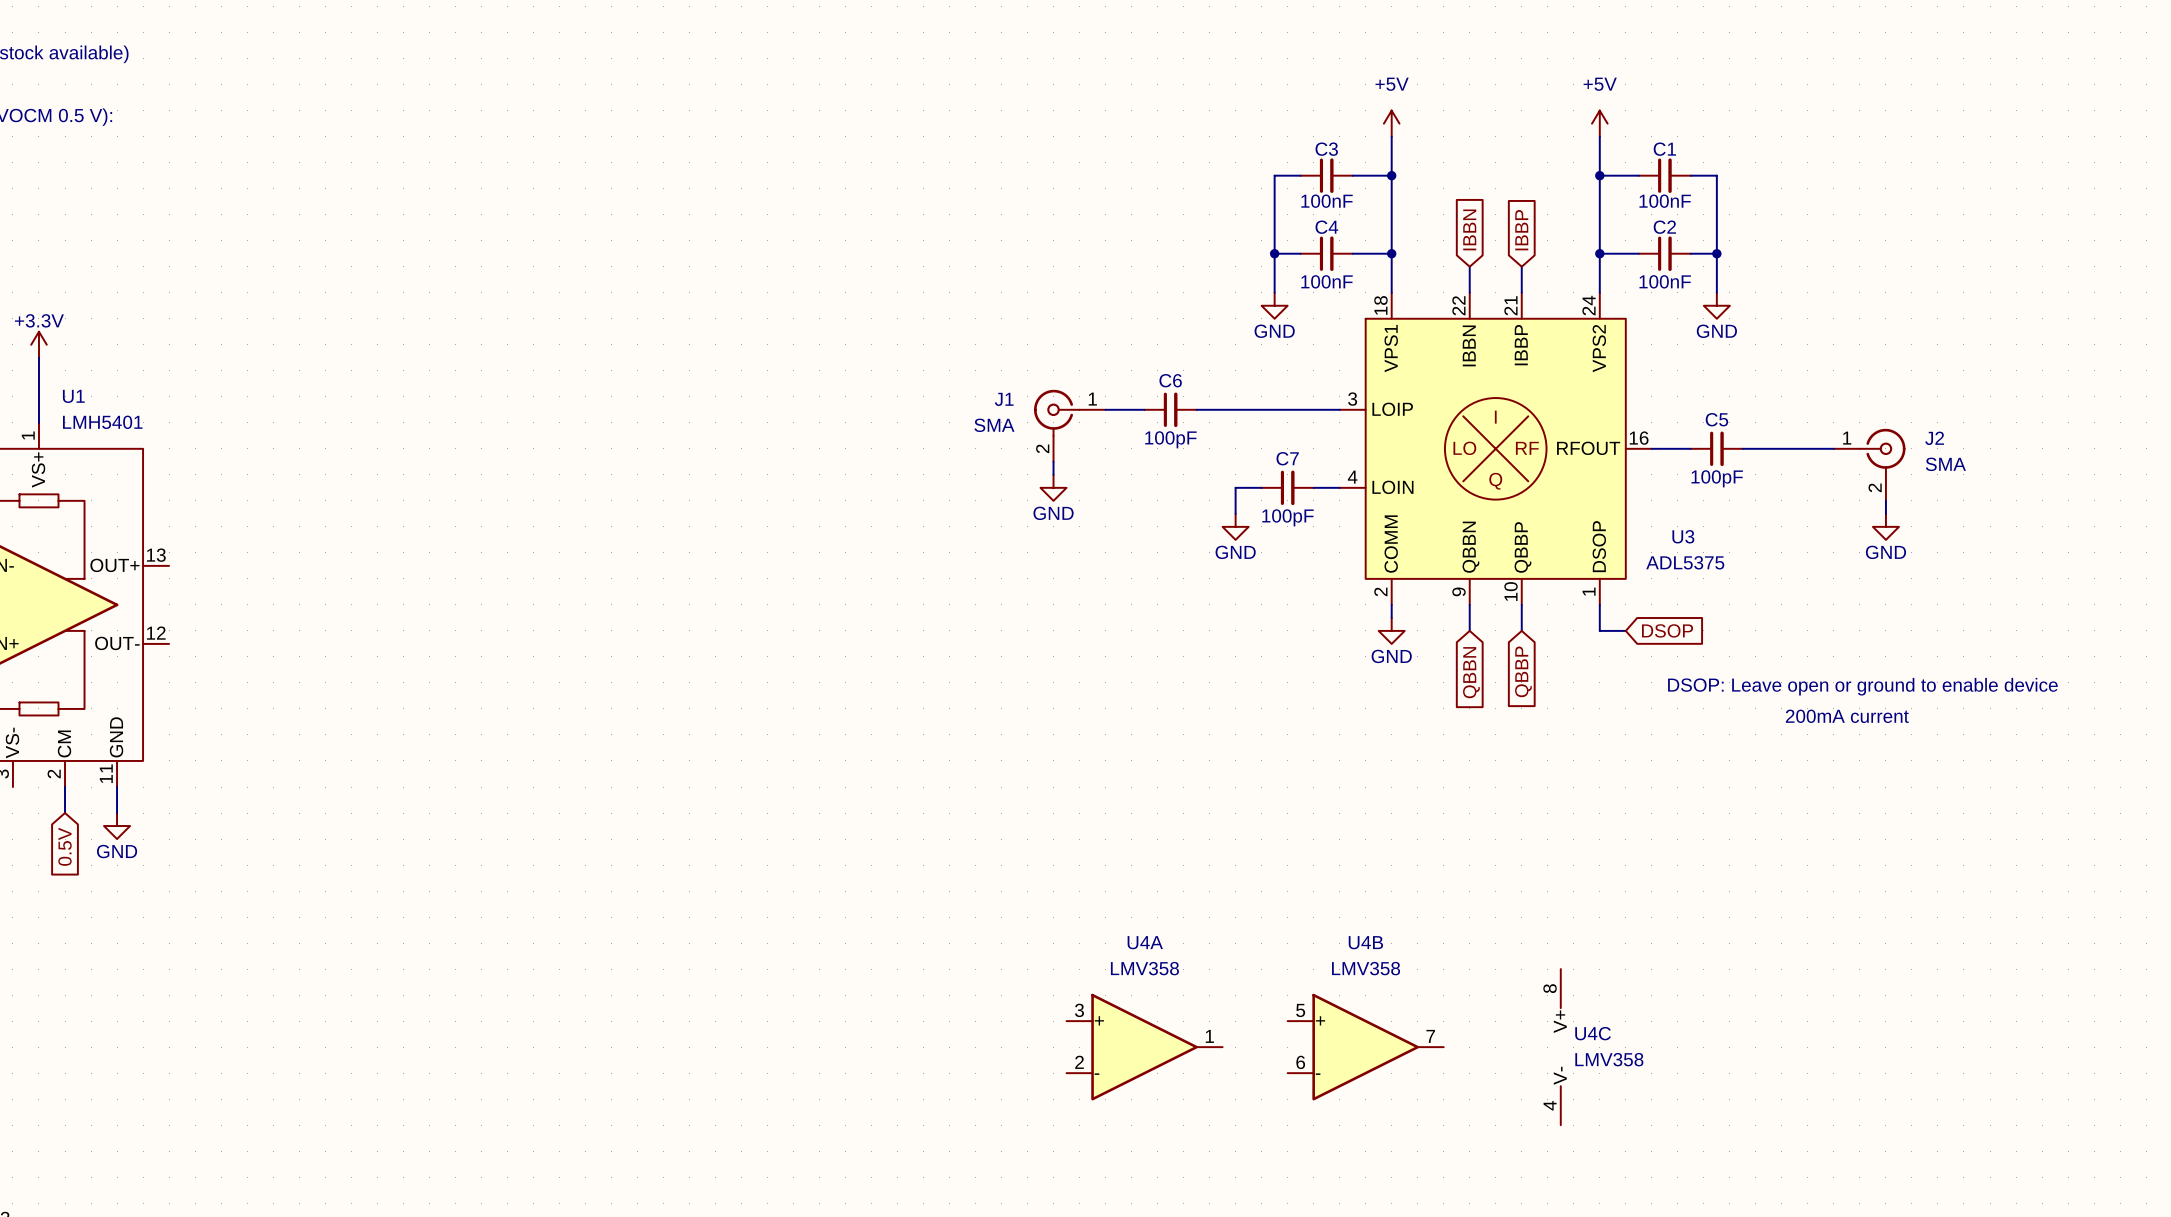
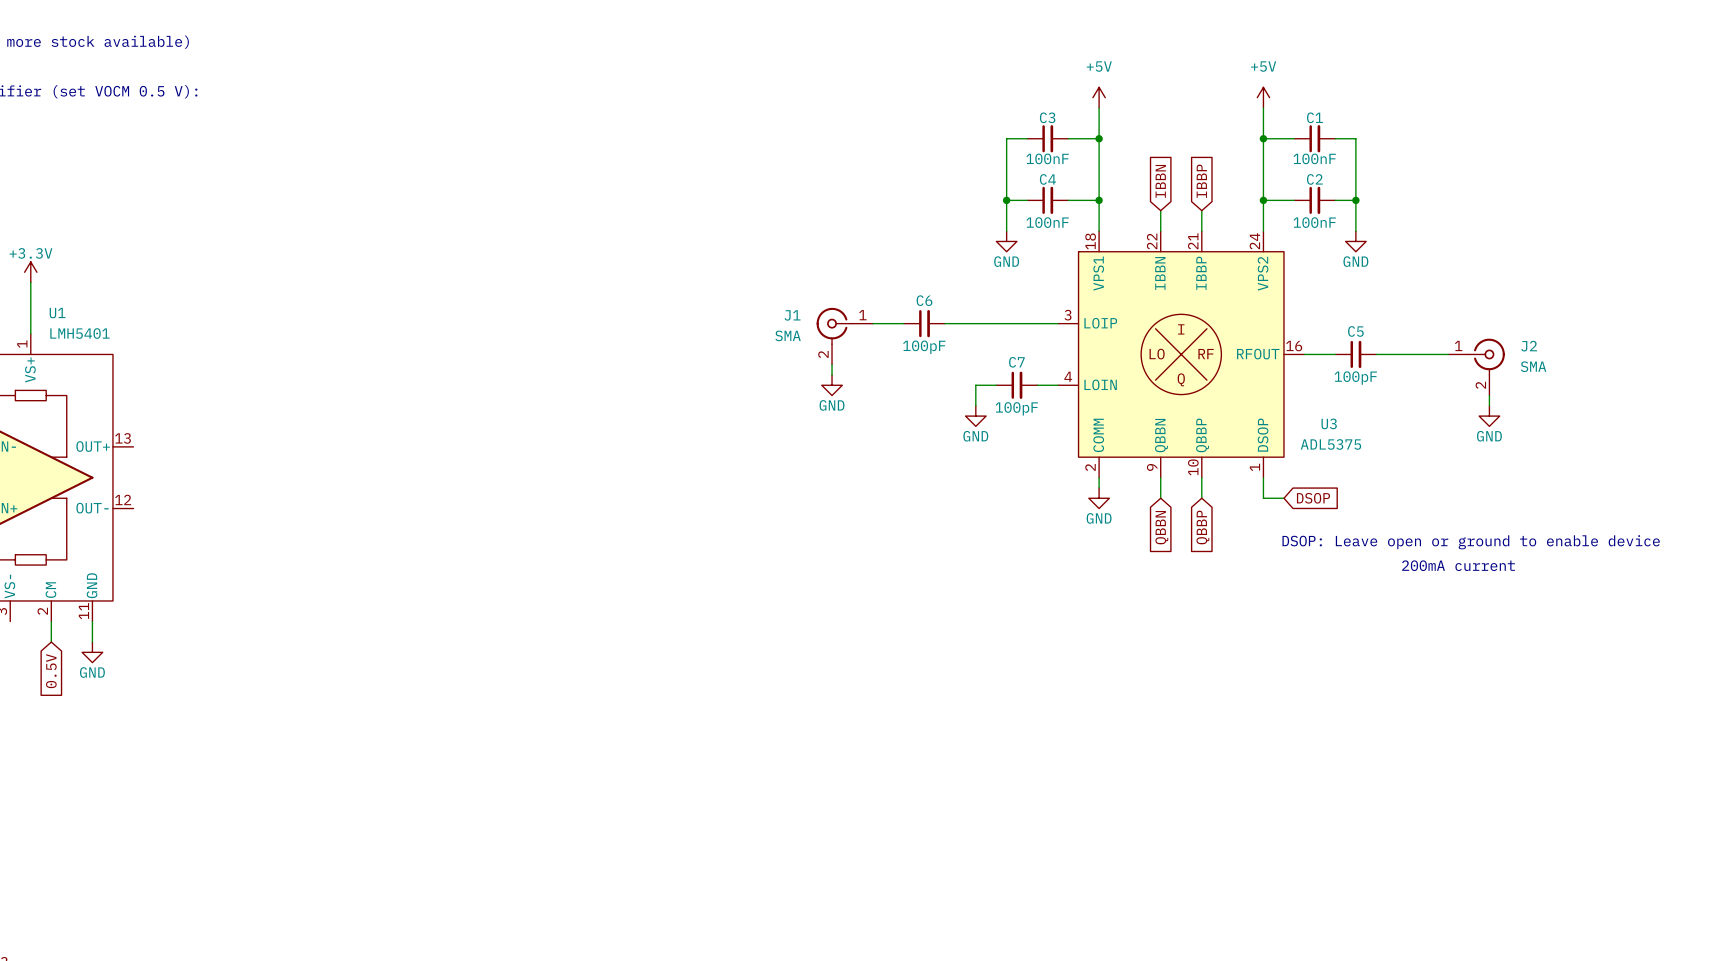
U4A: LMV358 (1144, 1047) -> none
U4B: LMV358 (1365, 1047) -> none
U4C: LMV358 (1560, 1047) -> none

